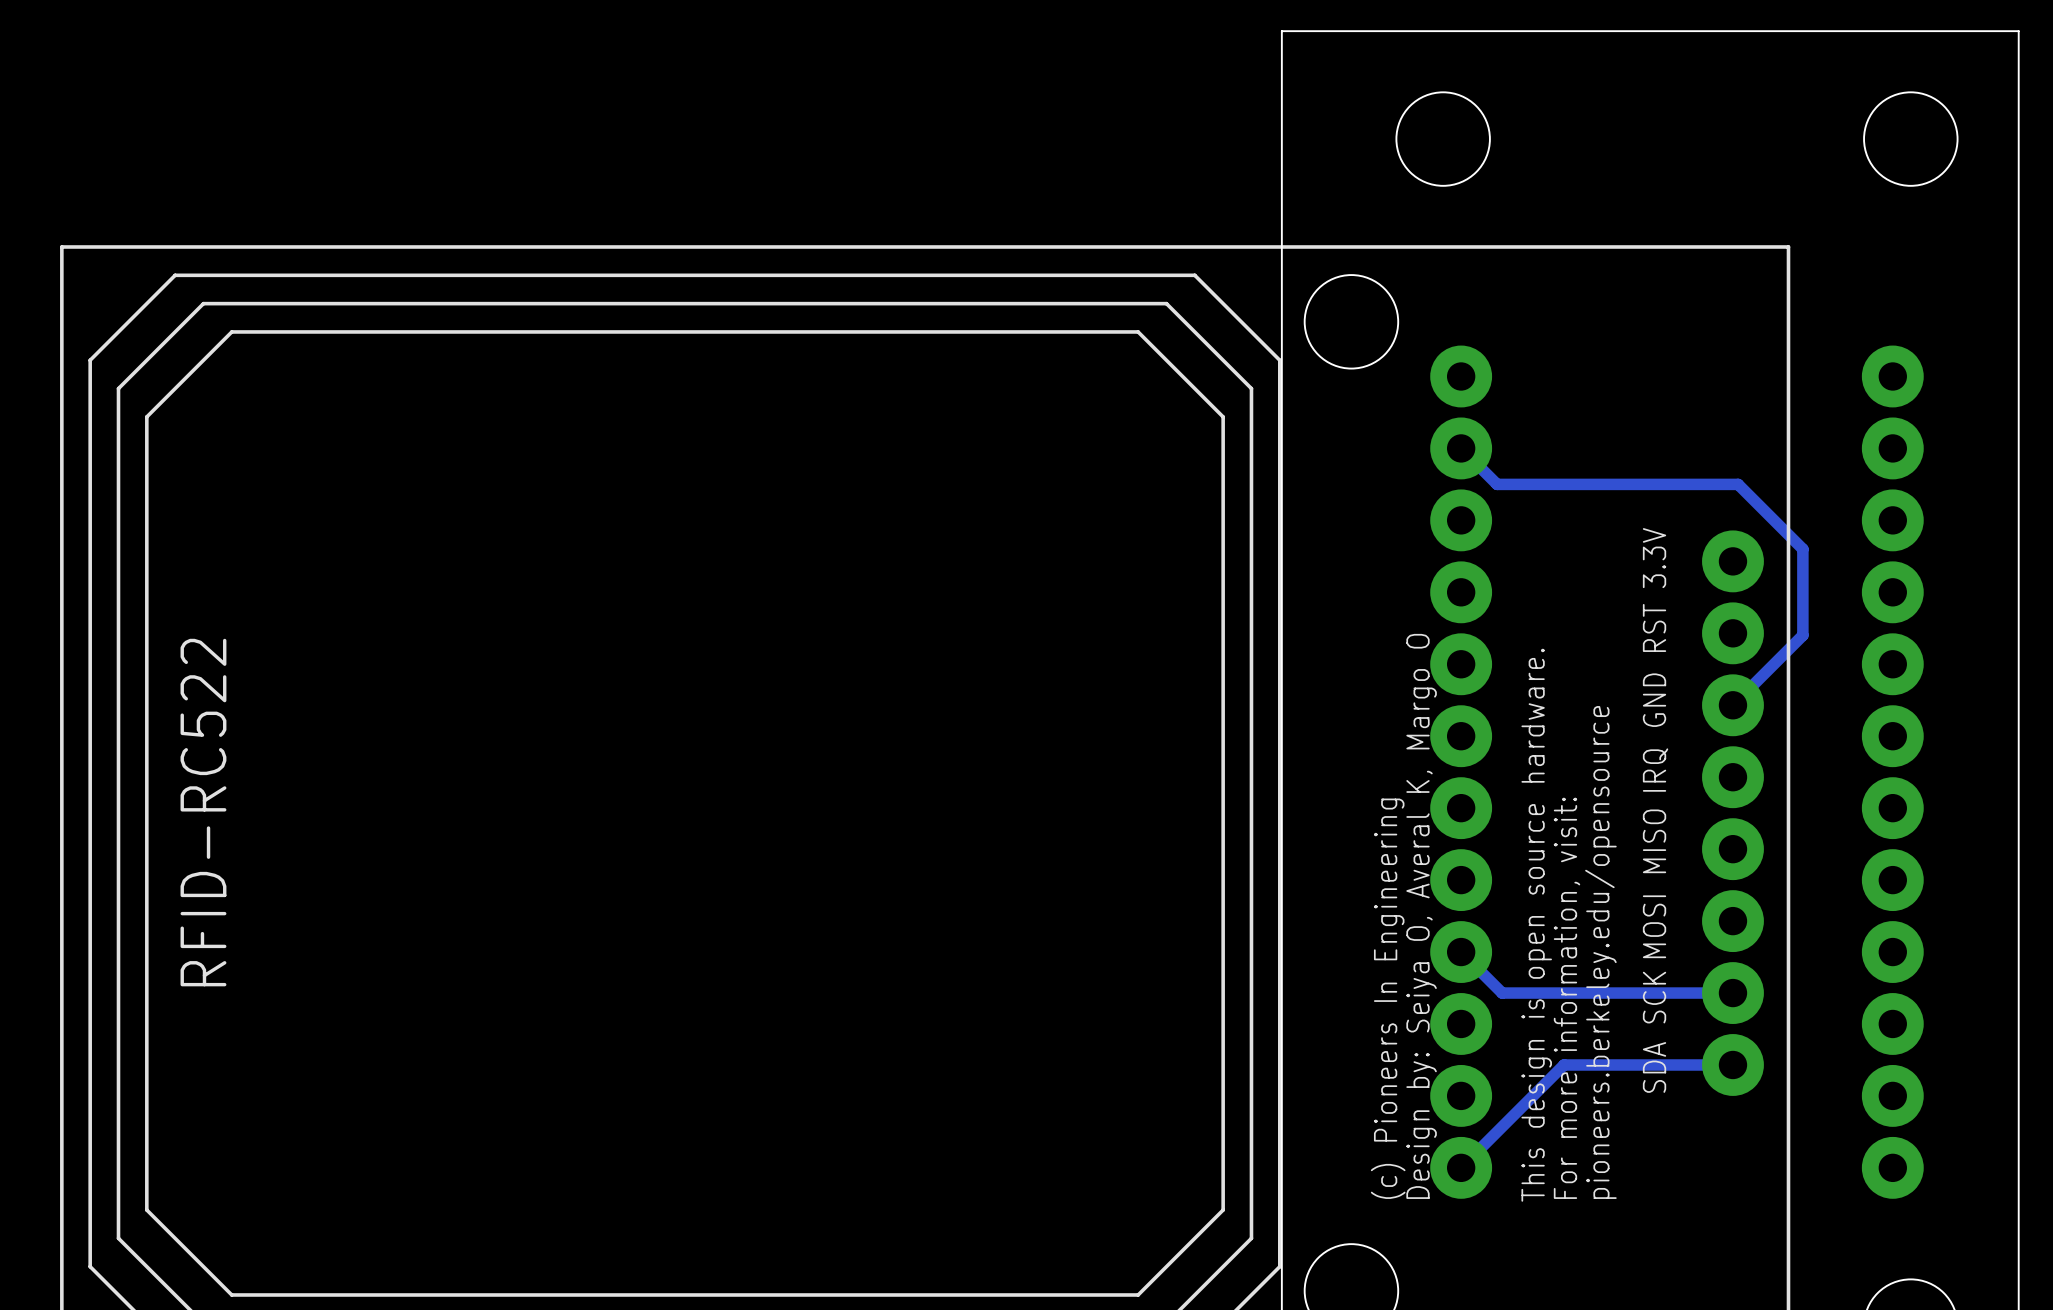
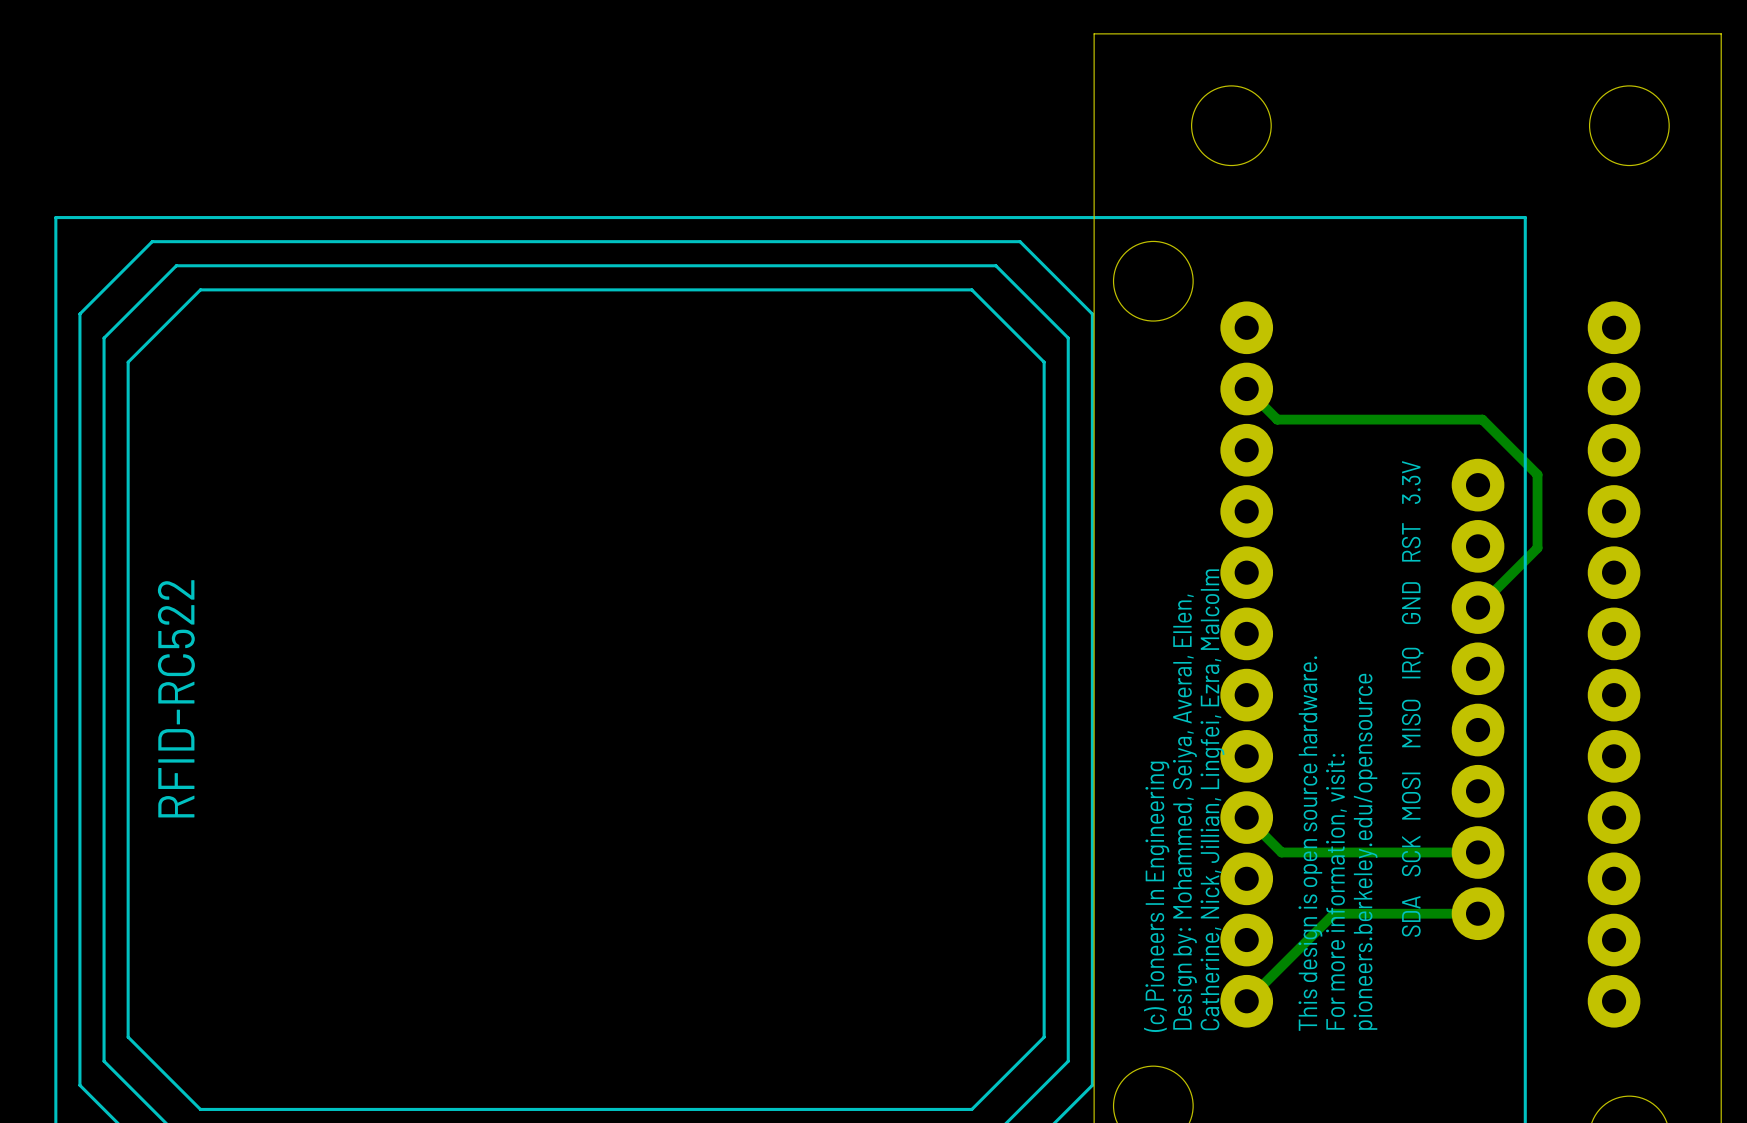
text: Design by: Seiya O, Averal K, Margo O (1421, 916) -> Catherine, Nick, Jillian, Lingfei, Ezra, Malcolm (1212, 799)
text: none -> (c) Pioneers In Engineering (1156, 896)
text: (c) Pioneers In Engineering (1388, 998) -> Design by: Mohammed, Seiya, Averal, Ellen, (1184, 812)

